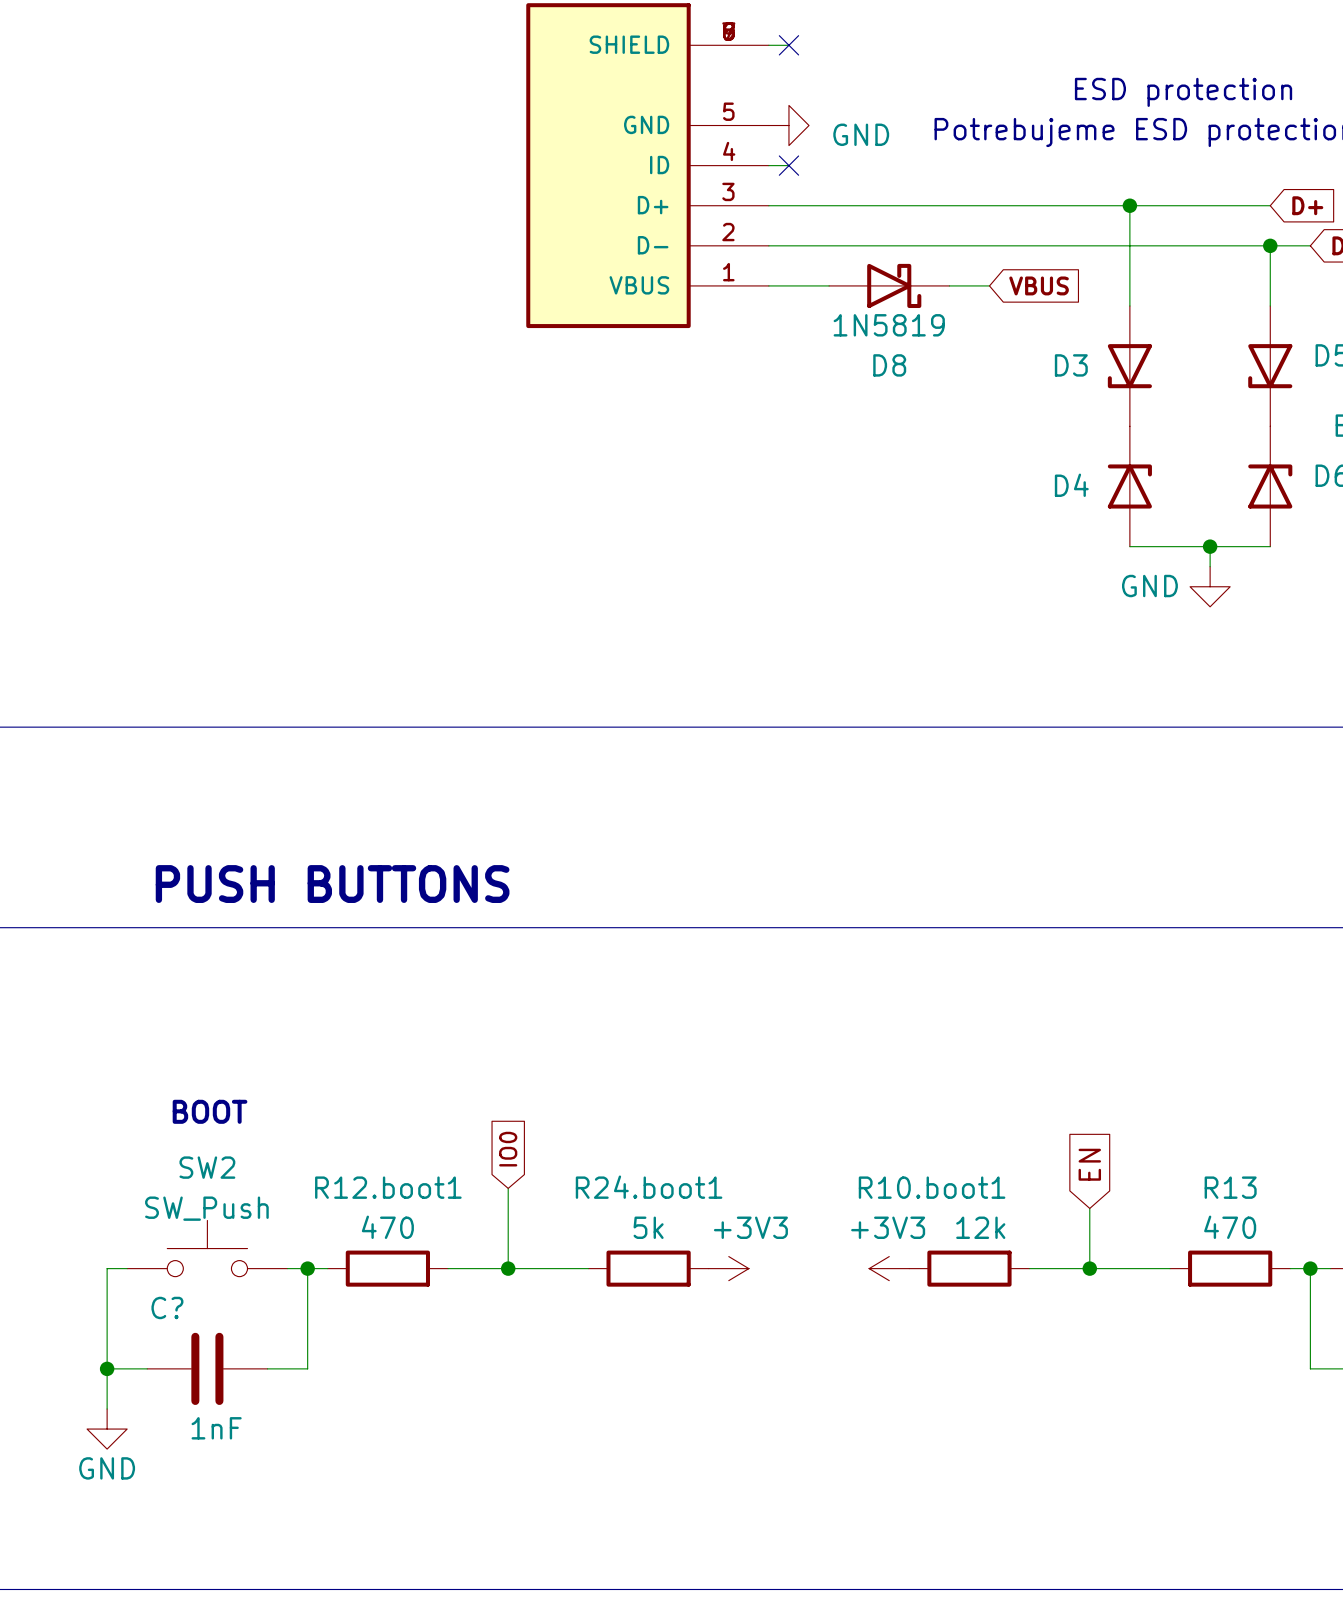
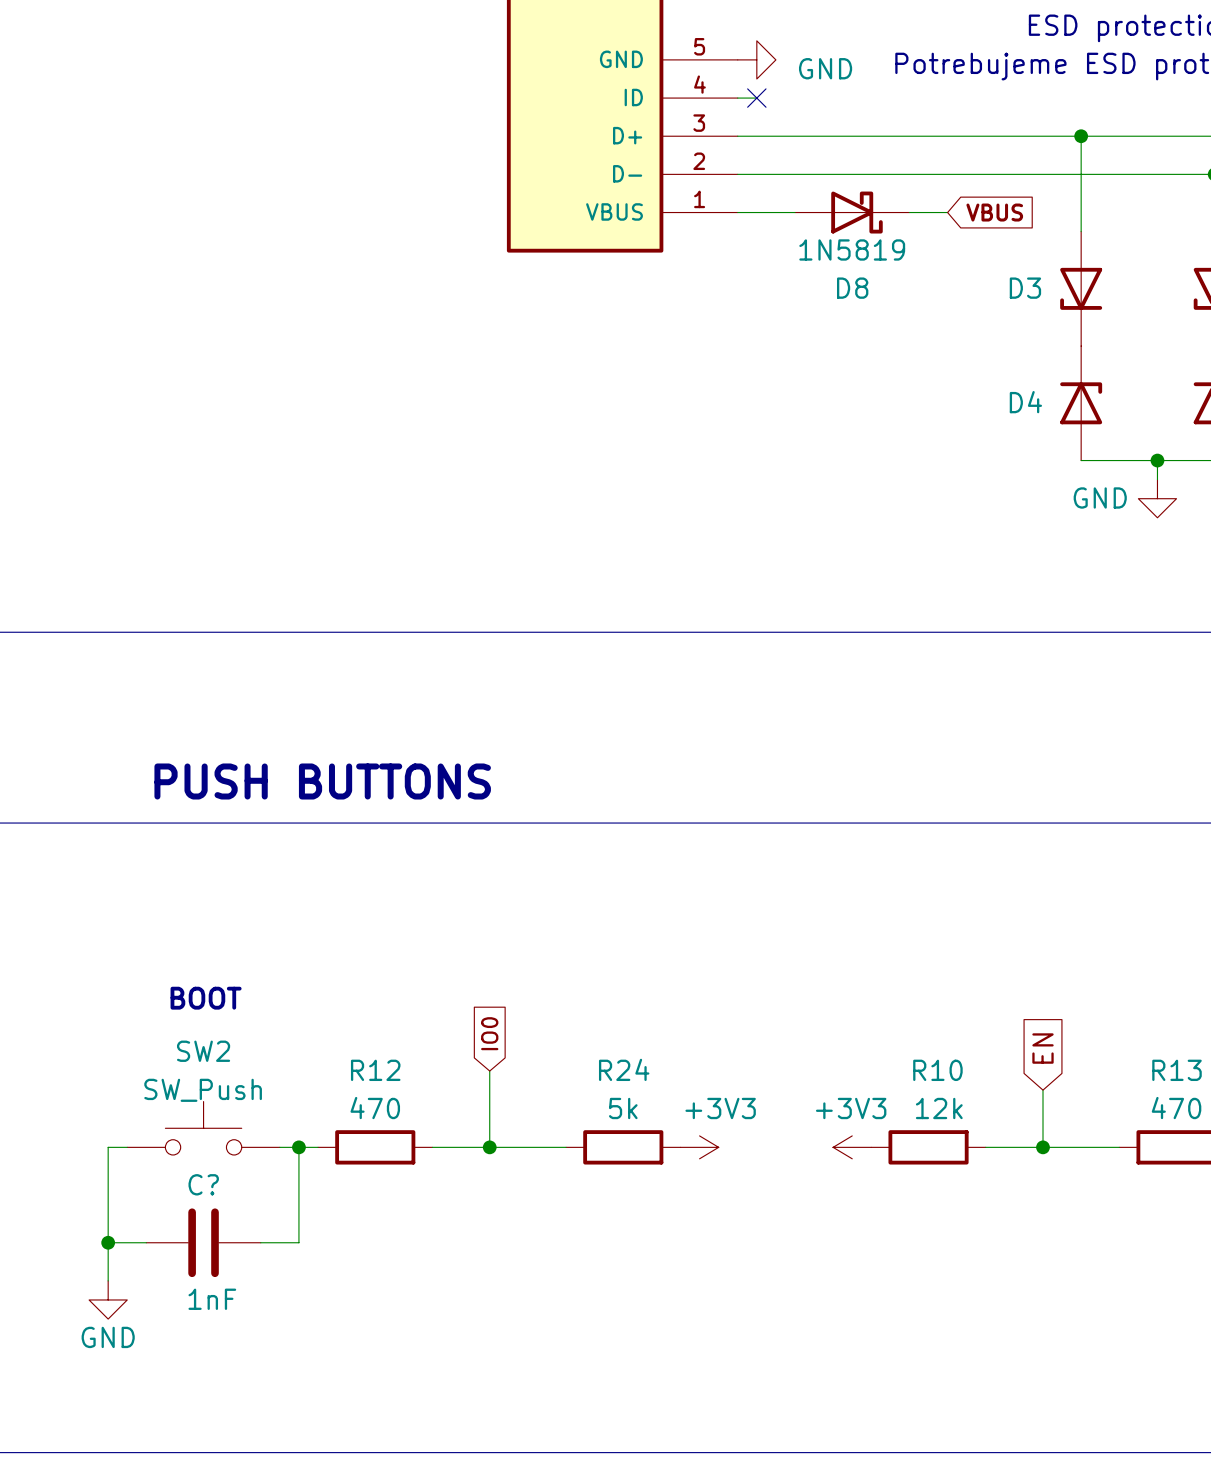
R12.boot1 name: R12.boot1 (388, 1187) -> R12 (375, 1070)
R24.boot1 name: R24.boot1 (649, 1187) -> R24 (624, 1069)
R10.boot1 name: R10.boot1 (932, 1187) -> R10 (937, 1070)
C? name position: C? (167, 1307) -> C? (203, 1184)

